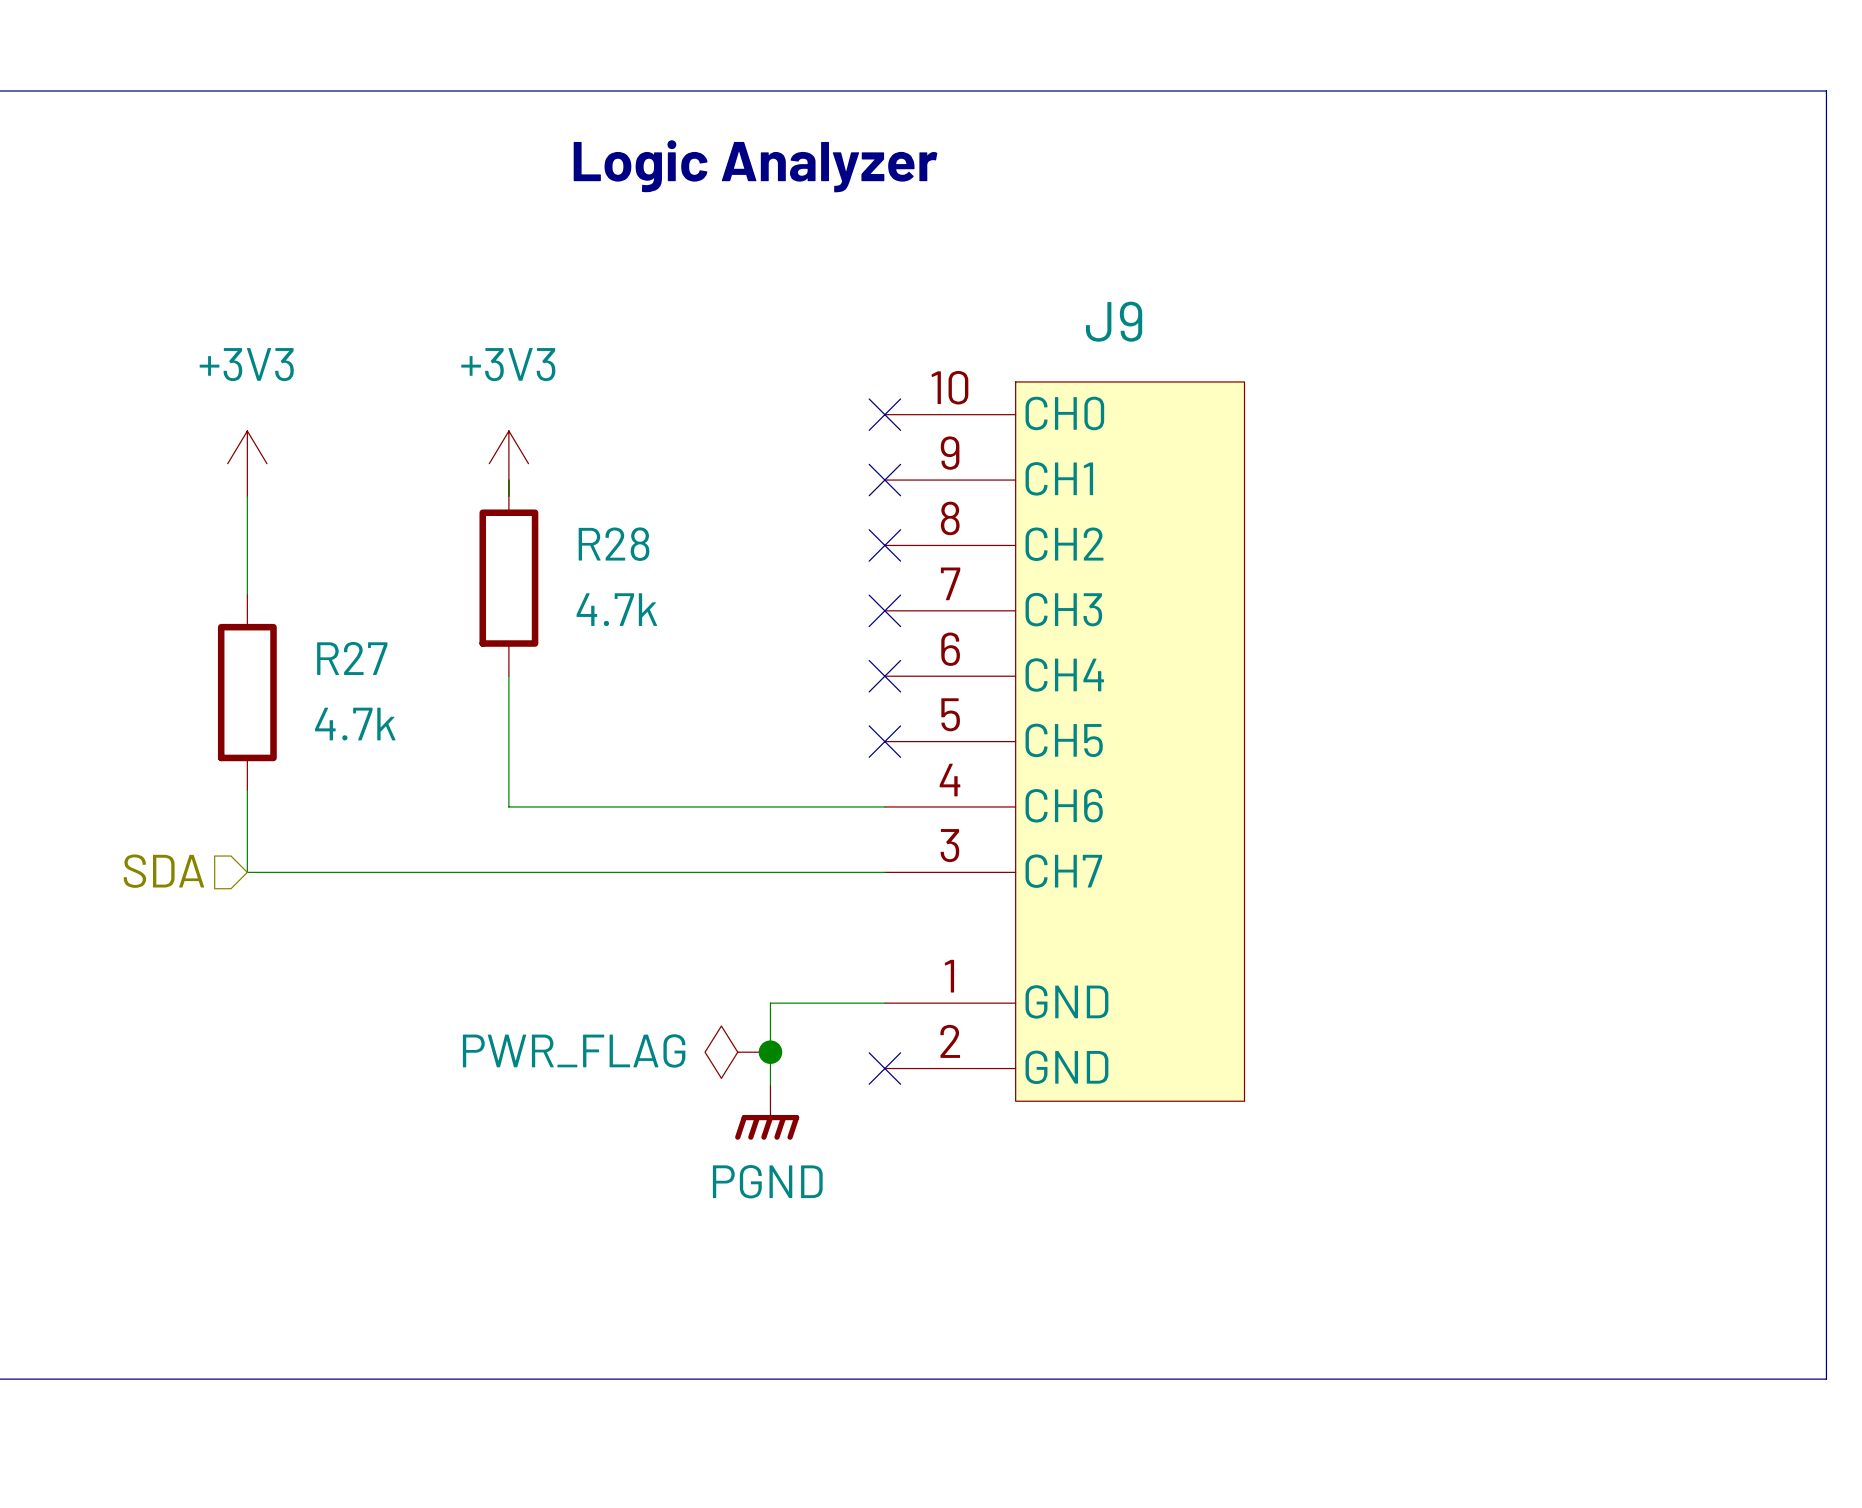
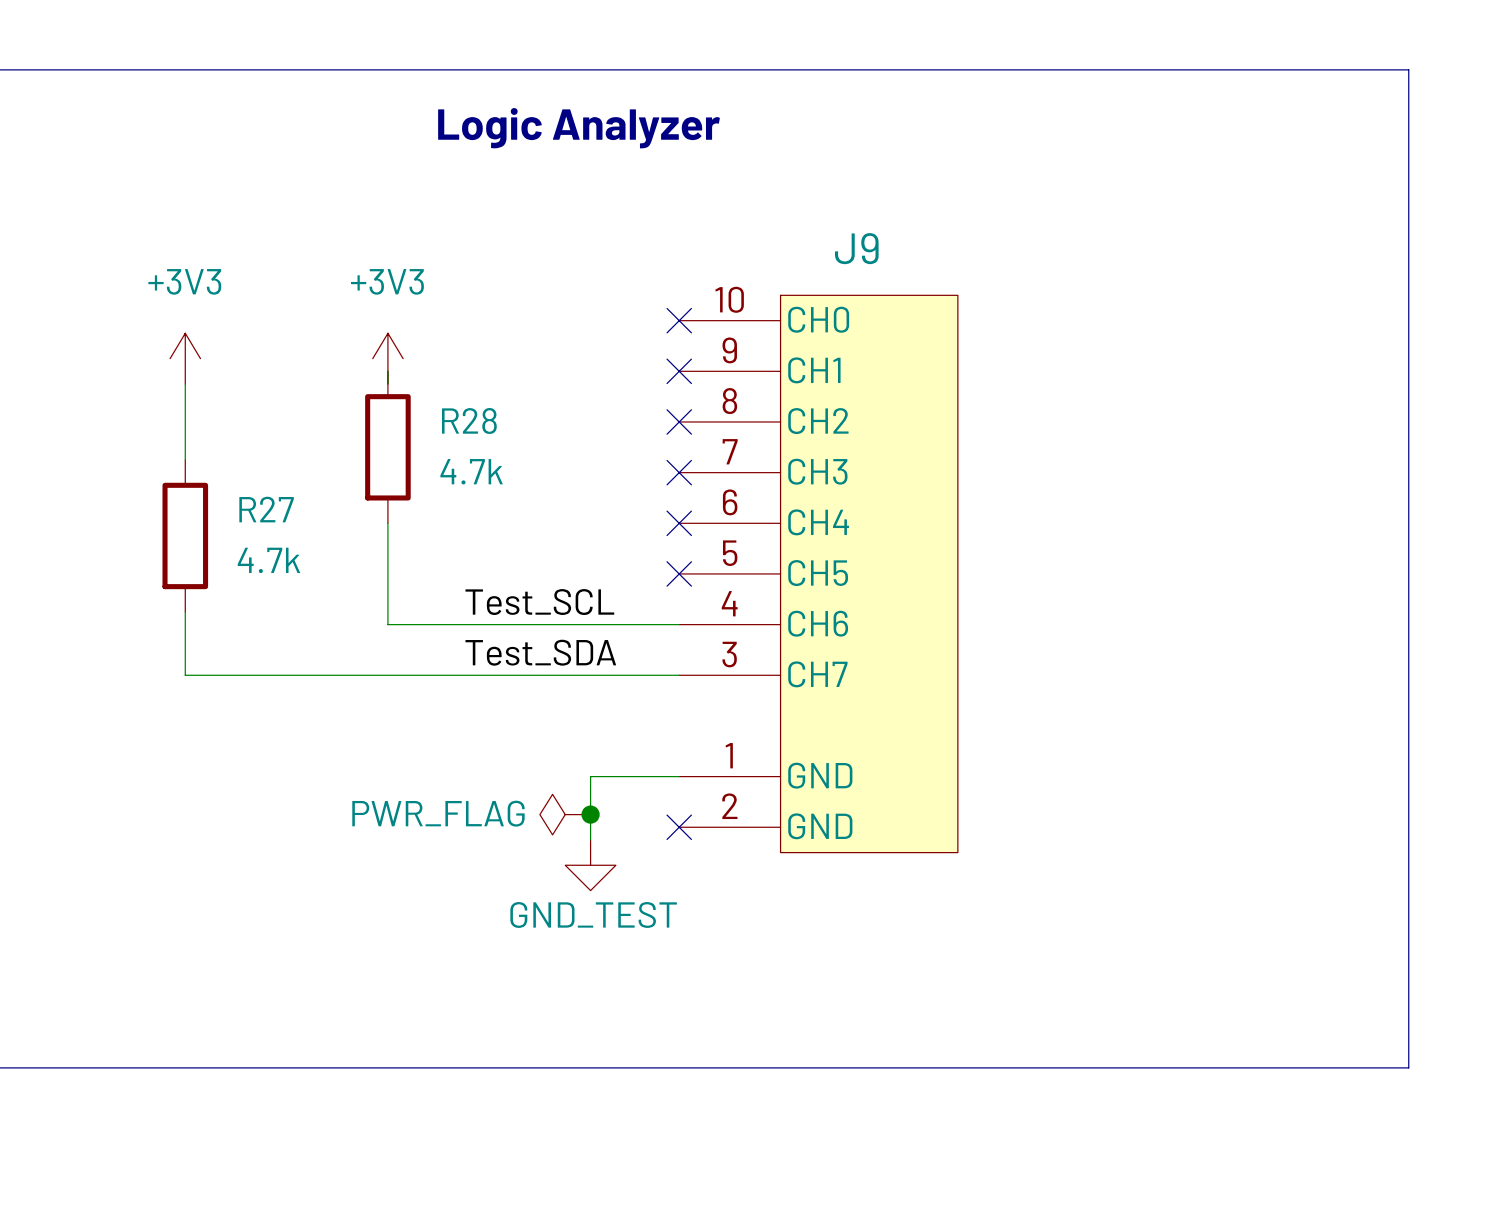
label: none -> Test_SCL (539, 602)
label: none -> Test_SDA (540, 652)
hierarchical label: SDA (163, 871) -> none
power symbol: PGND (767, 1112) -> GND_TEST (590, 865)

